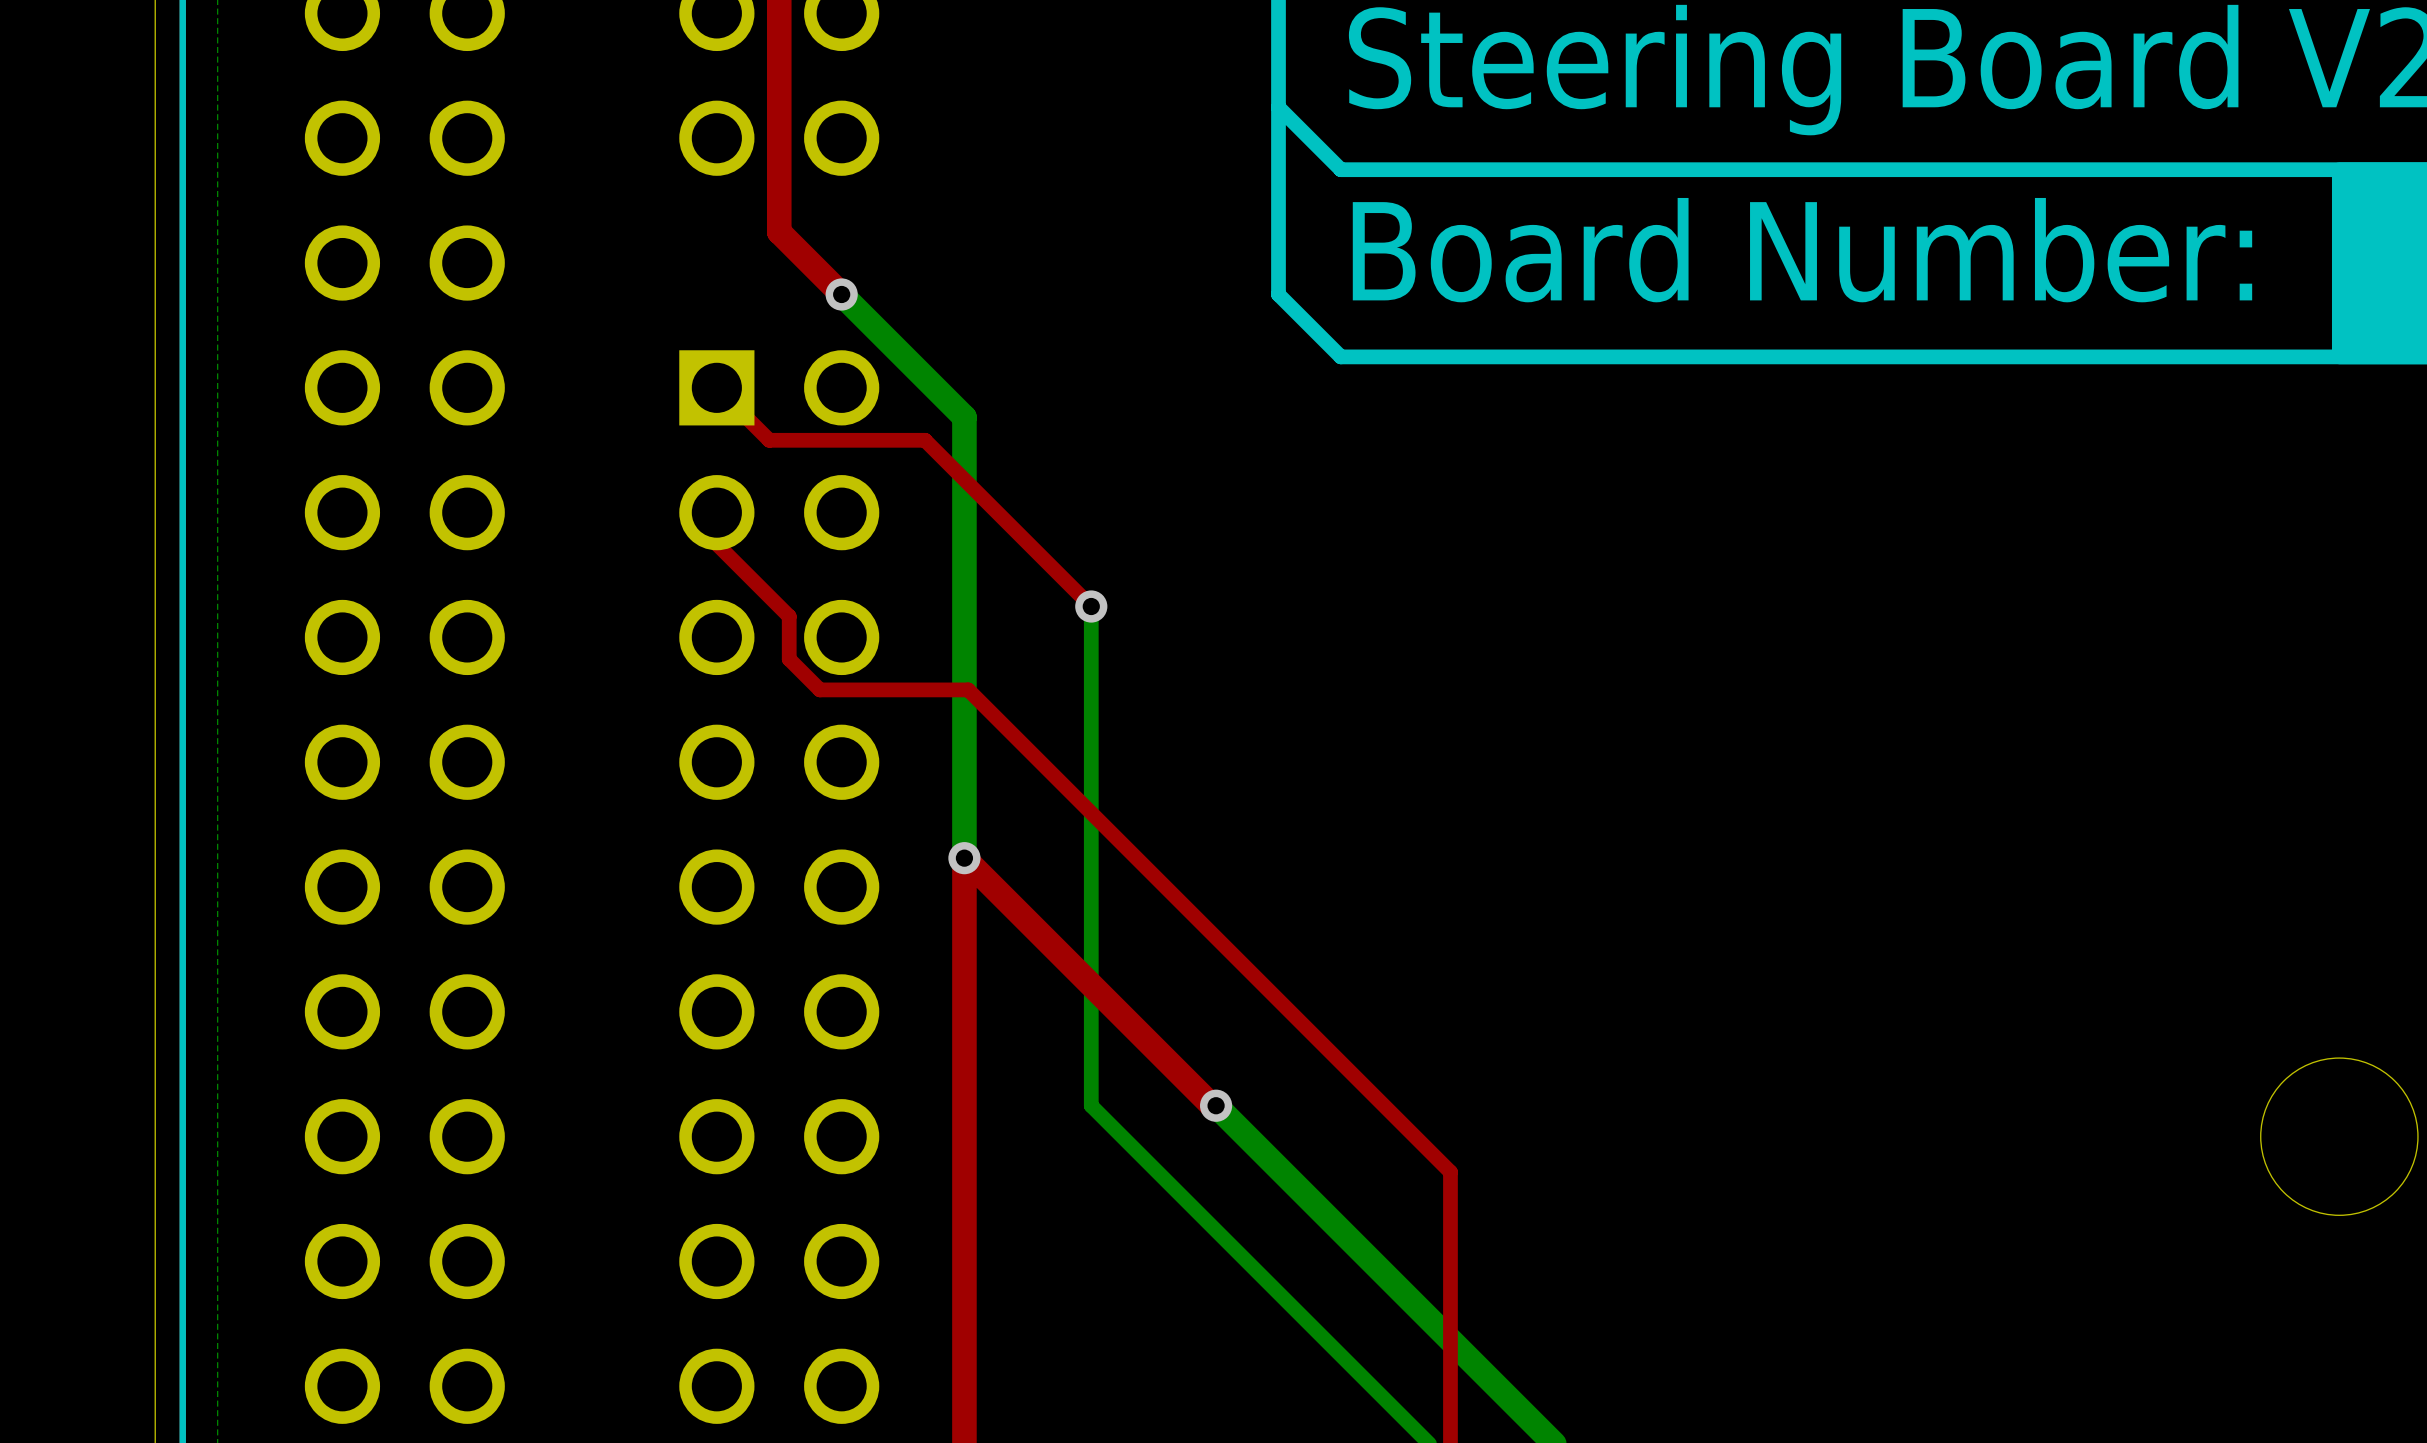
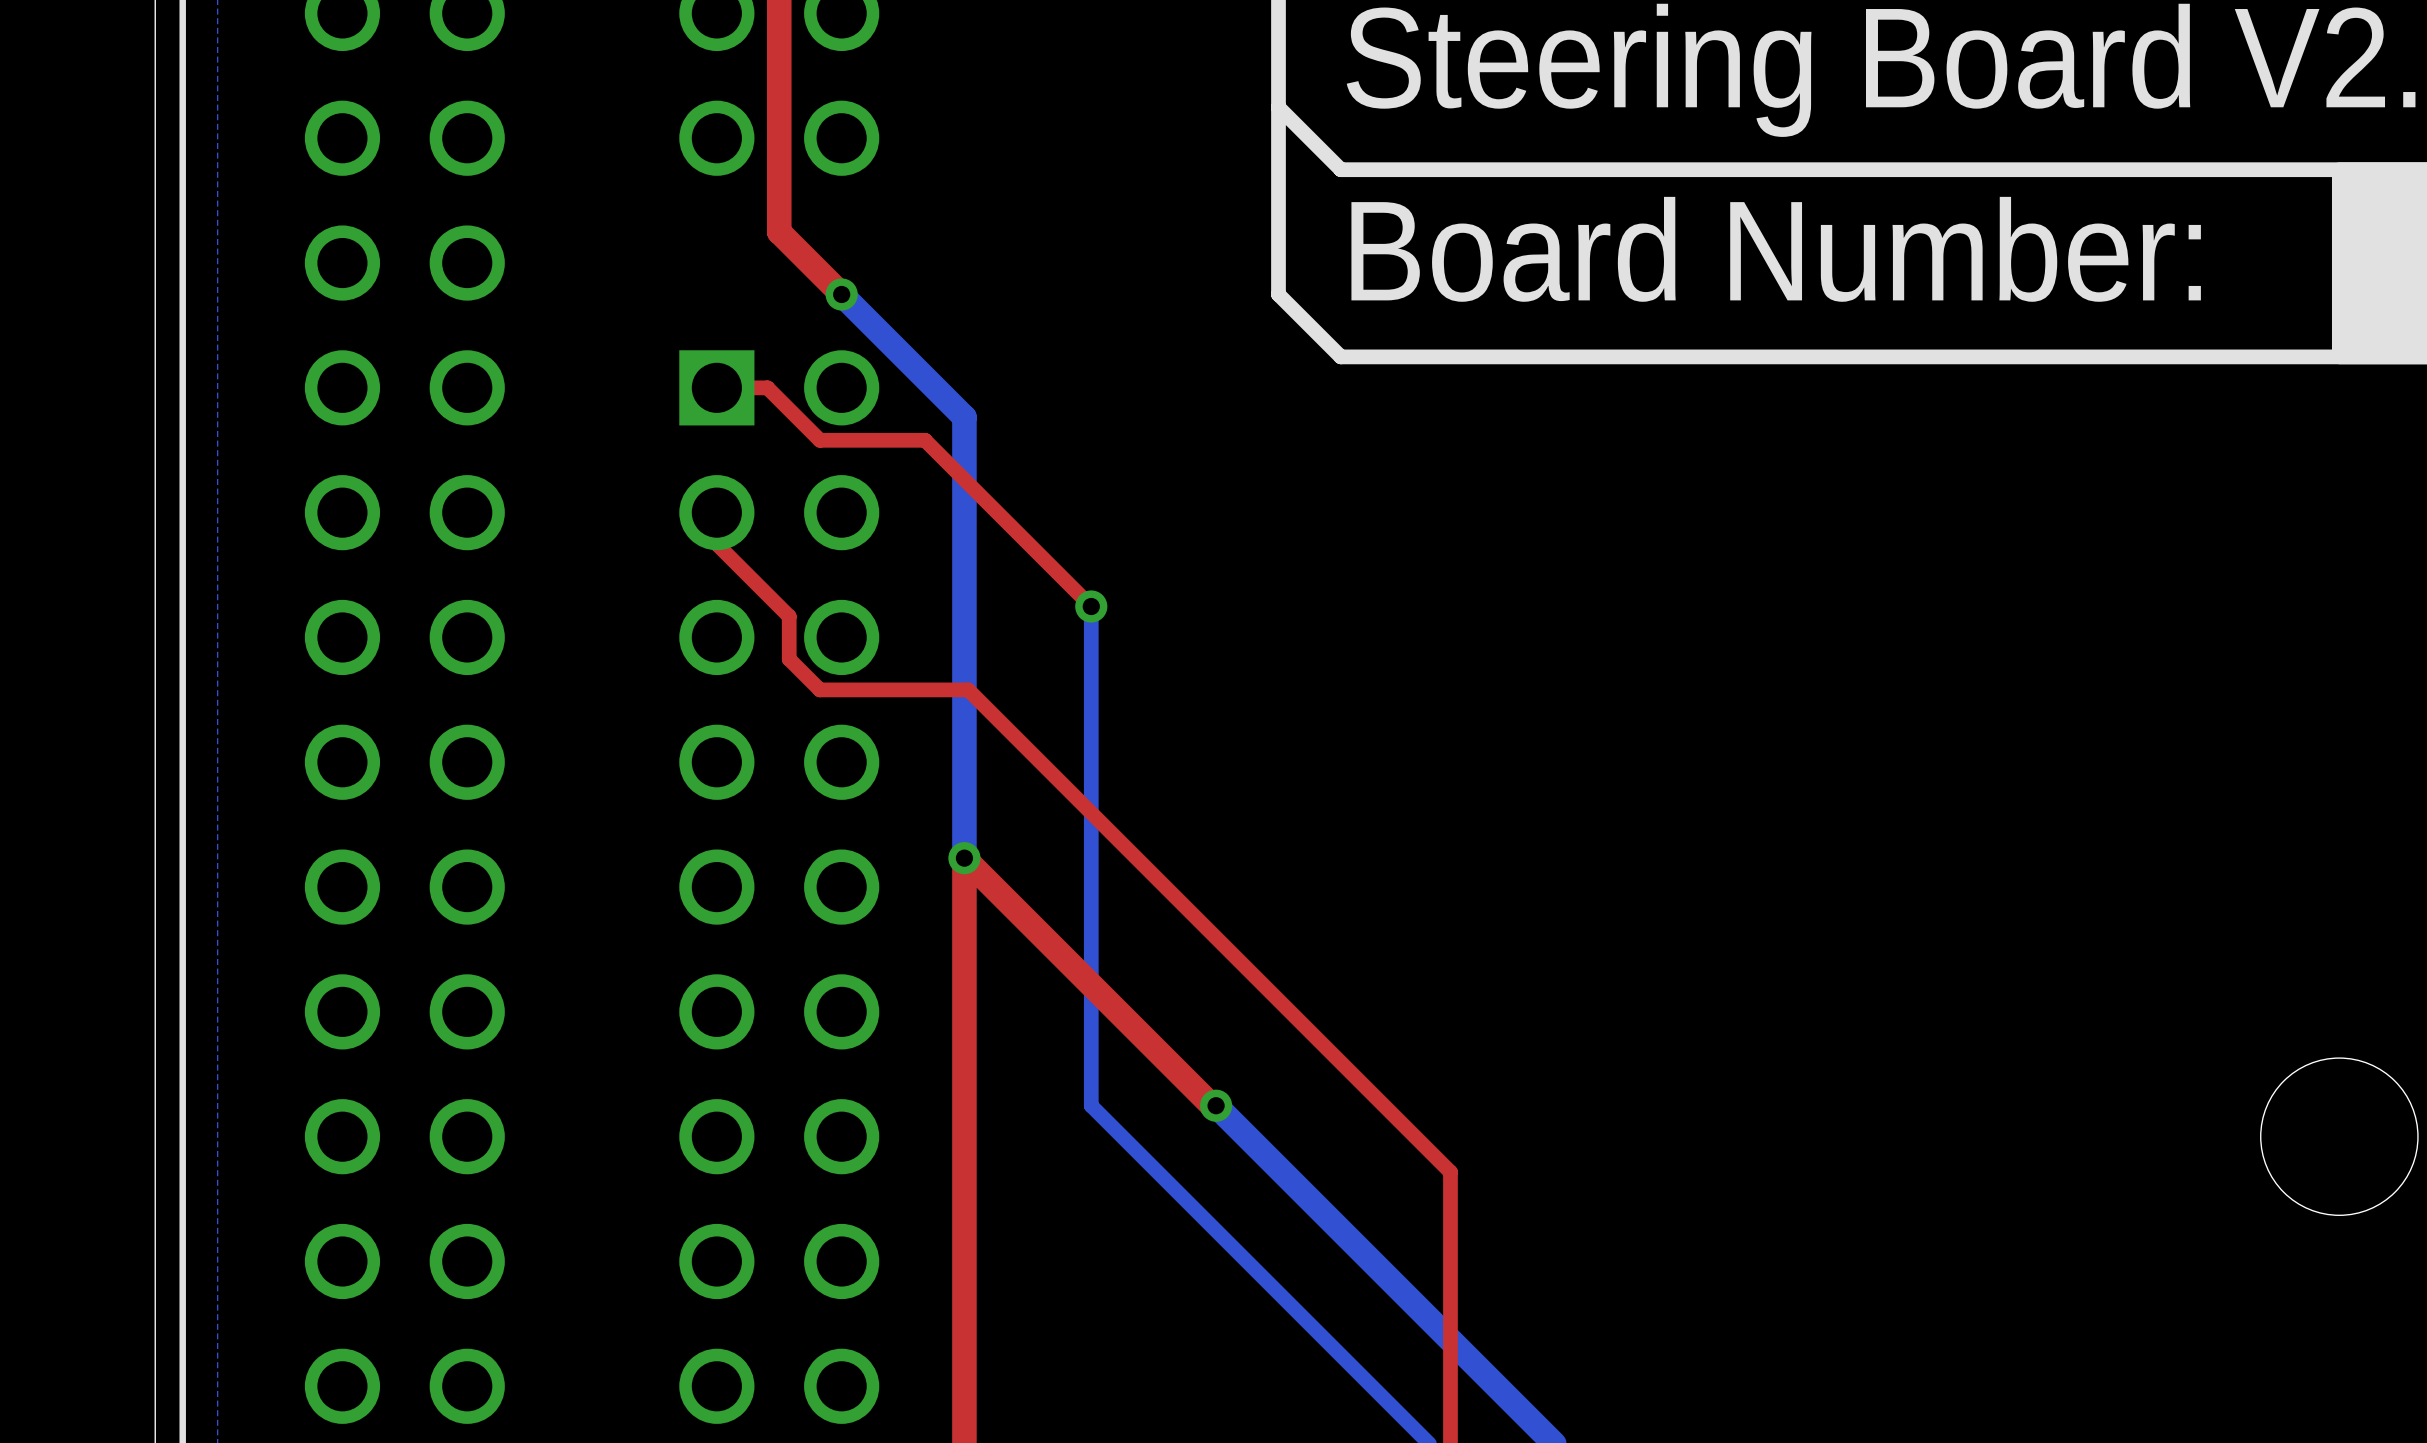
top track: (716, 387) (769, 440) (819, 440) -> (716, 387) (767, 387) (819, 440)

